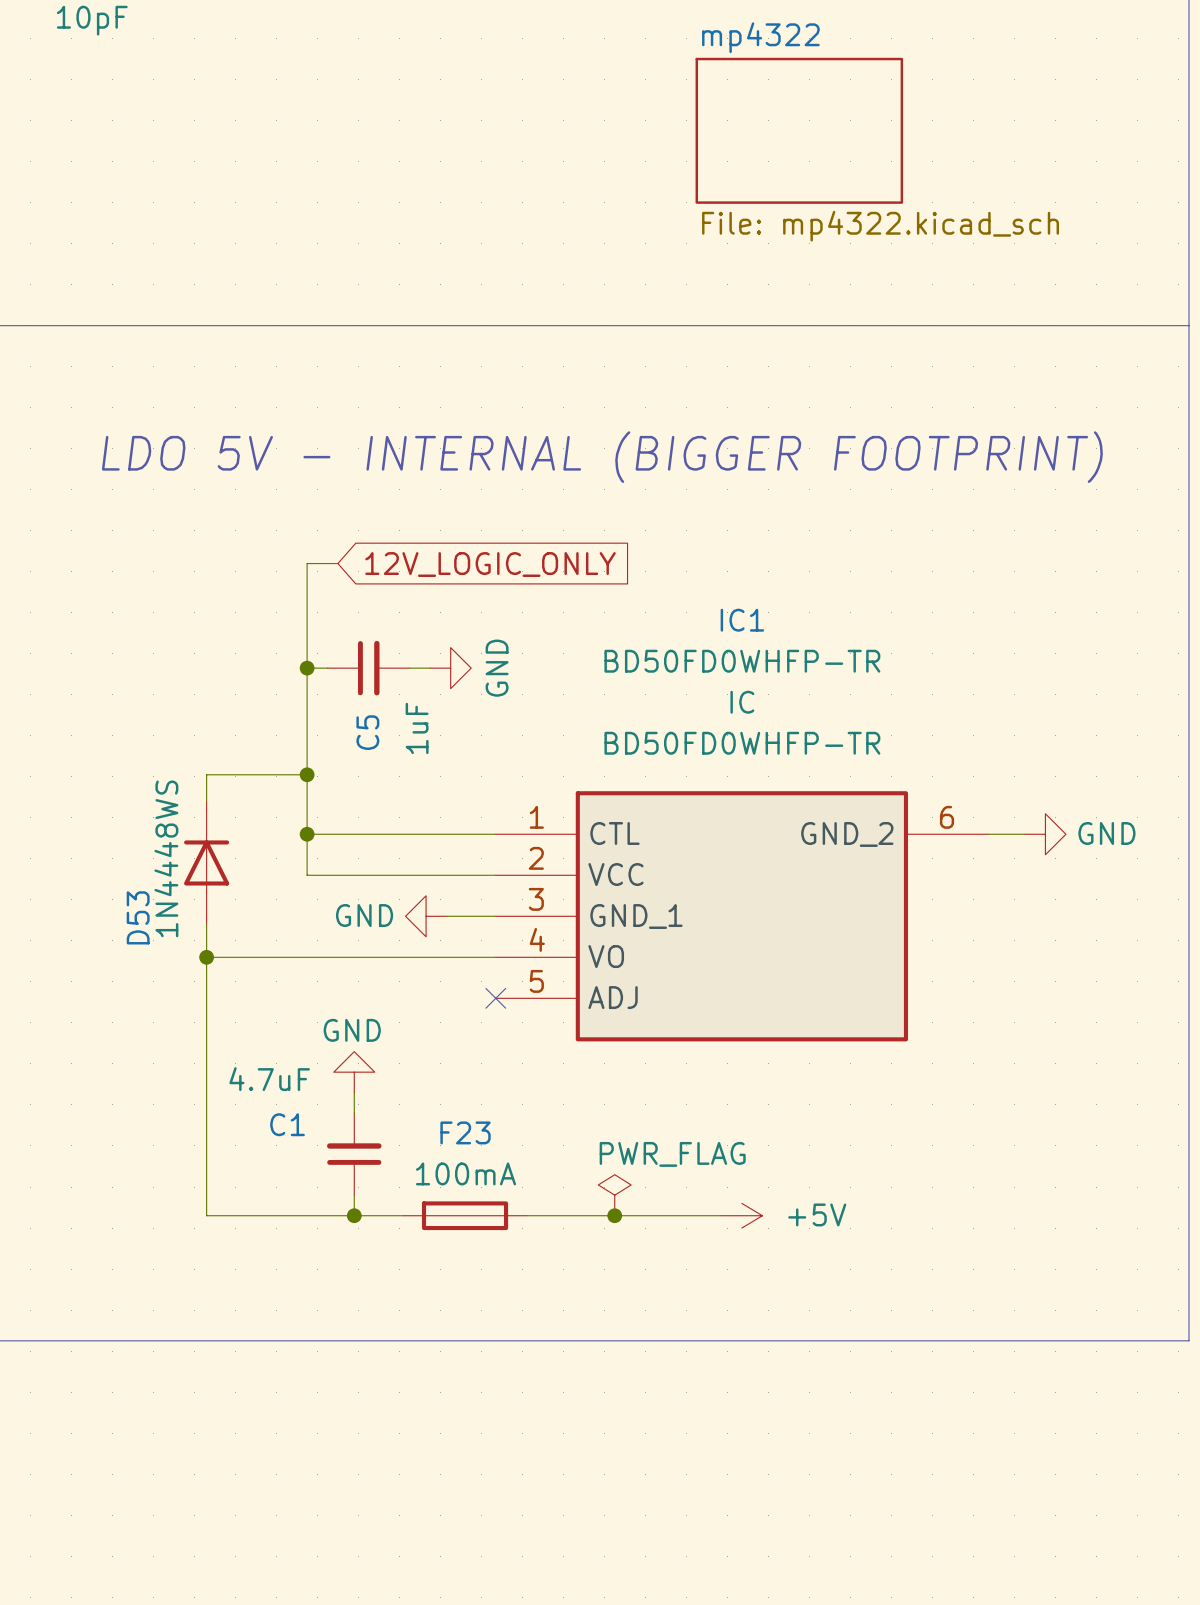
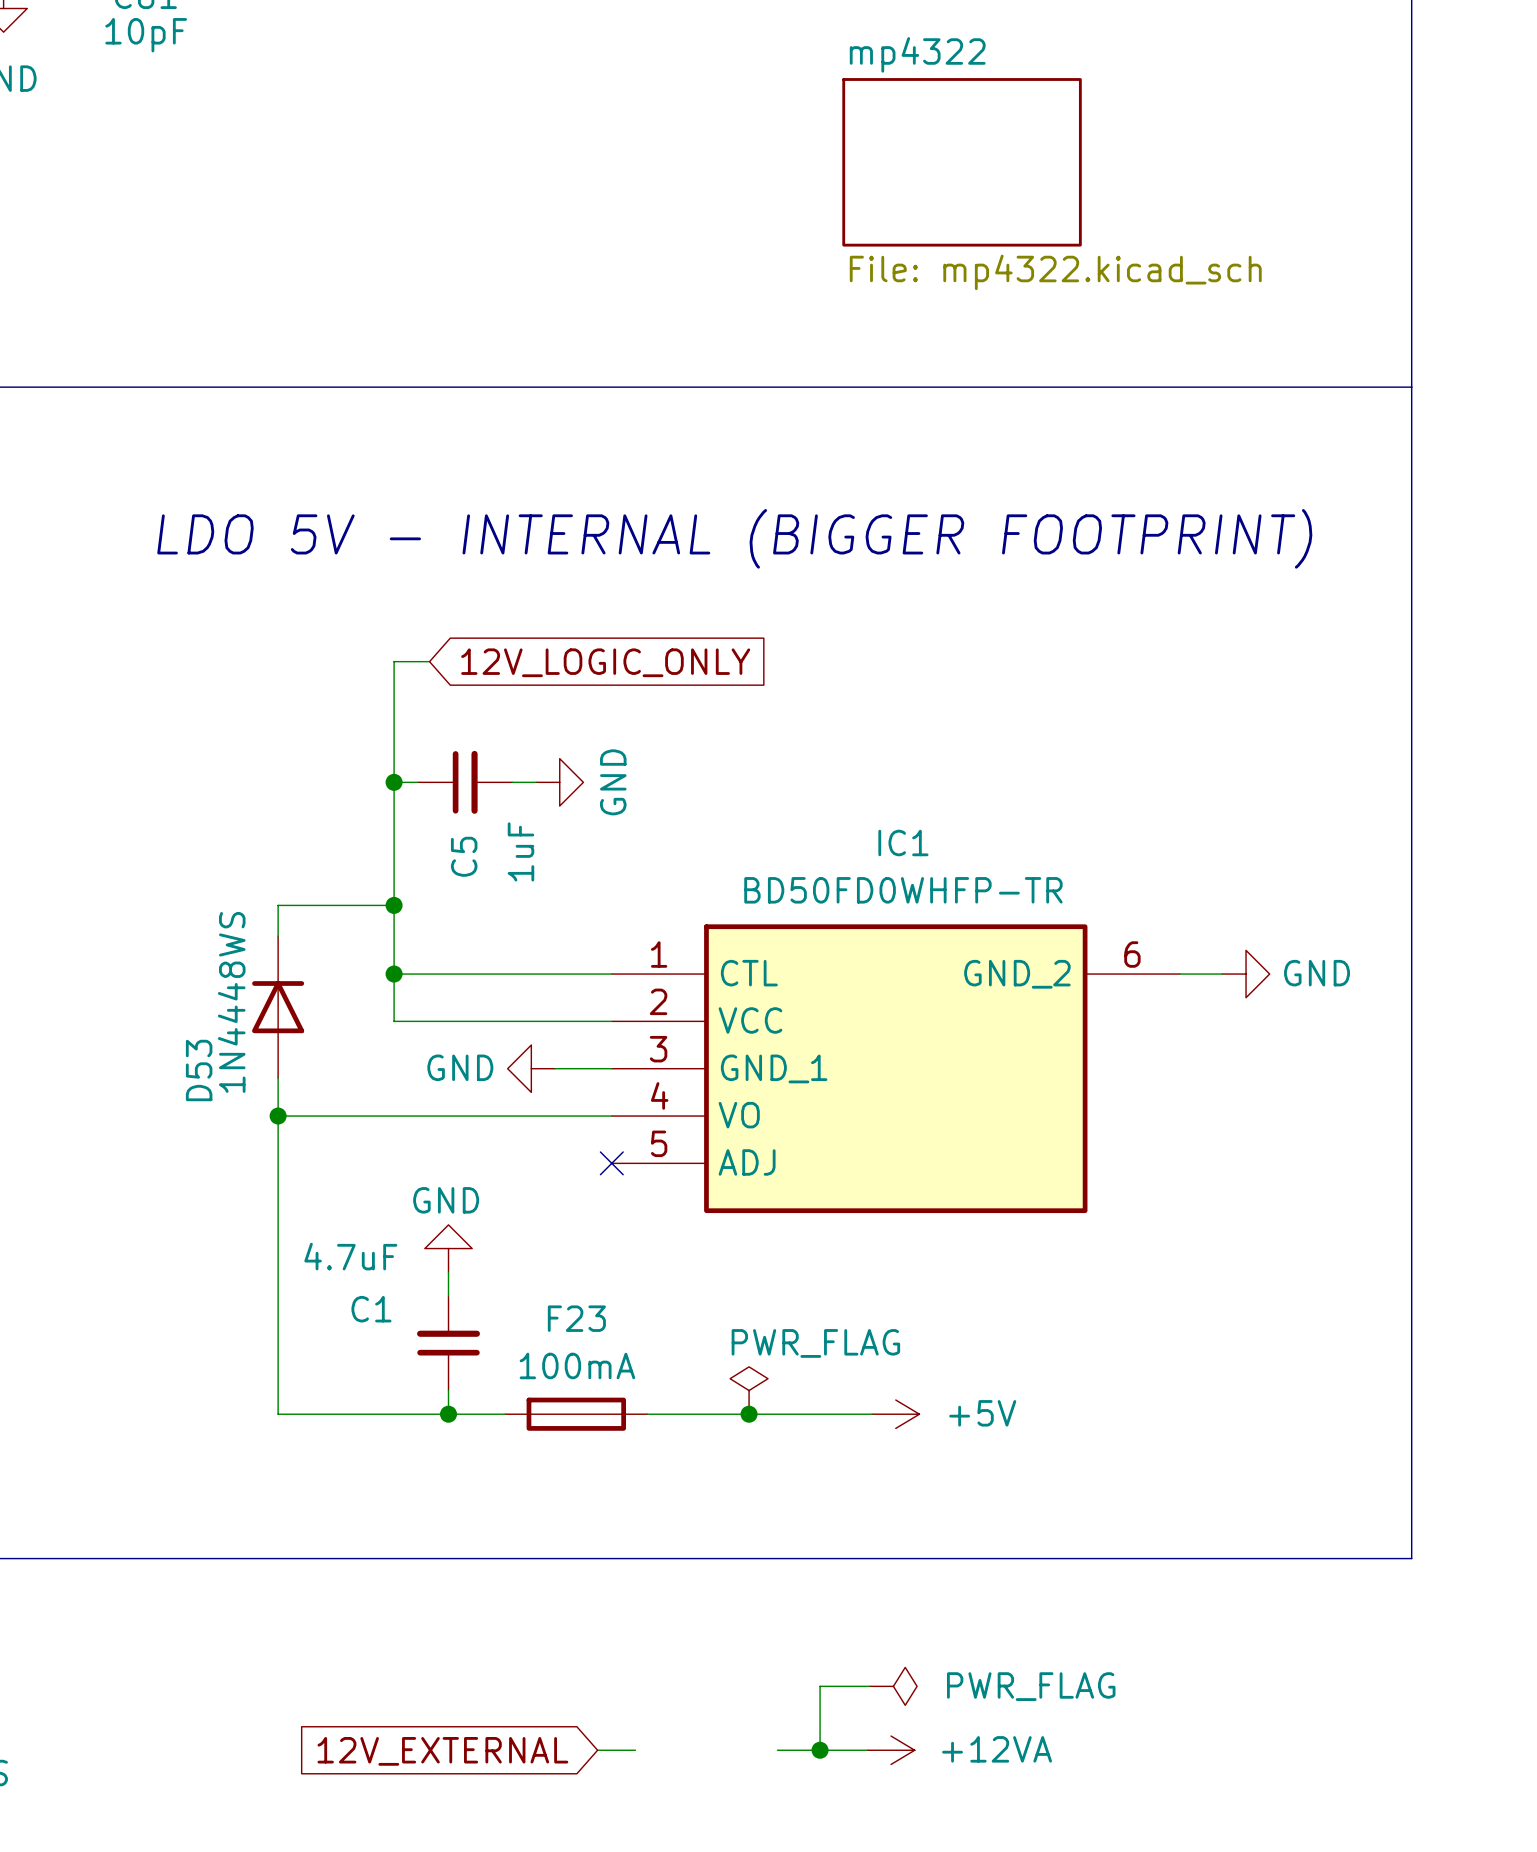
IC1 name position: IC1 (742, 620) -> IC1 (903, 842)
IC1 value position: BD50FD0WHFP-TR (742, 661) -> BD50FD0WHFP-TR (903, 890)
IC1 text: IC (742, 702) -> none
IC1 text: BD50FD0WHFP-TR (742, 743) -> none
wire: none -> (869, 1686) (820, 1686) (820, 1750)
power symbol: none -> PWR_FLAG (893, 1686)
wire: none -> (597, 1750) (635, 1750)
wire: none -> (777, 1750) (867, 1750)
junction: none -> (820, 1750)
power symbol: none -> +12VA (891, 1750)
global label: none -> 12V_EXTERNAL (442, 1751)

